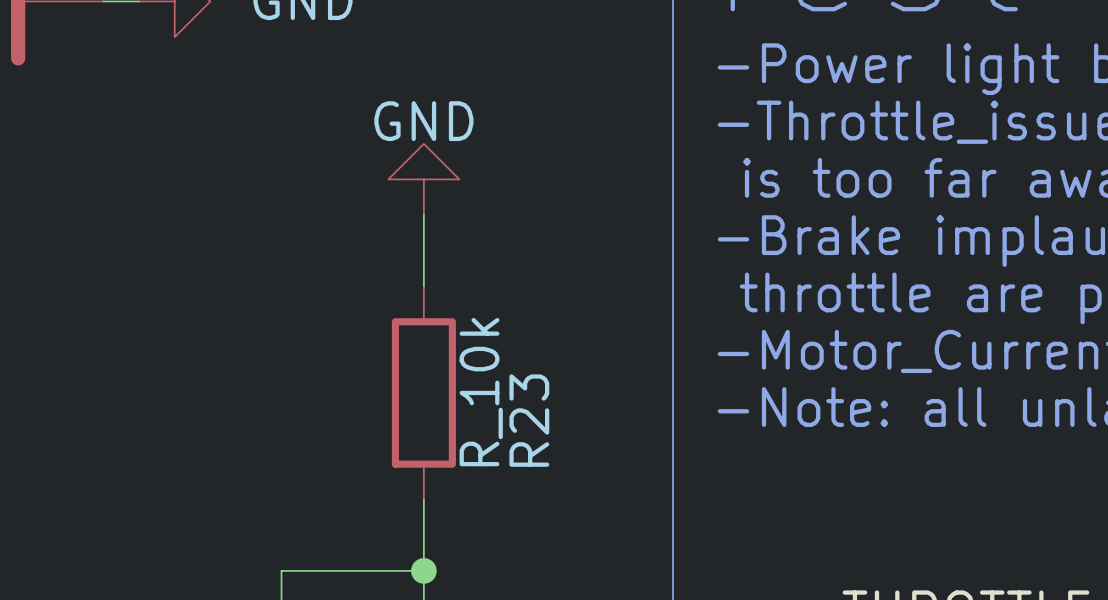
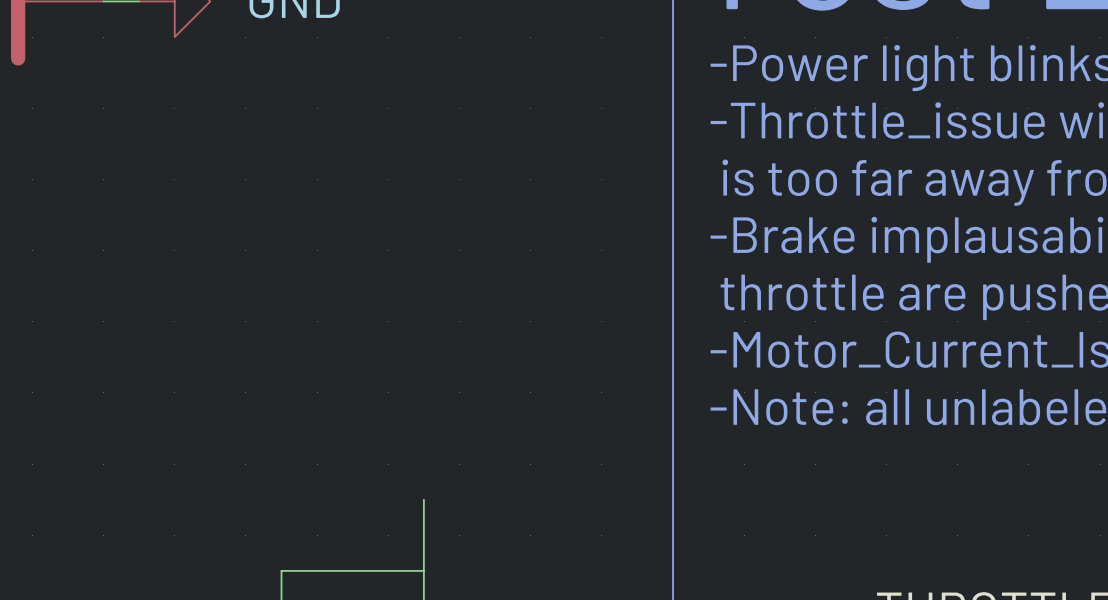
power symbol: GND (423, 179) -> none
wire: (423, 215) (423, 286) -> none
R23: R_10k (423, 392) -> none
junction: (423, 570) -> none

